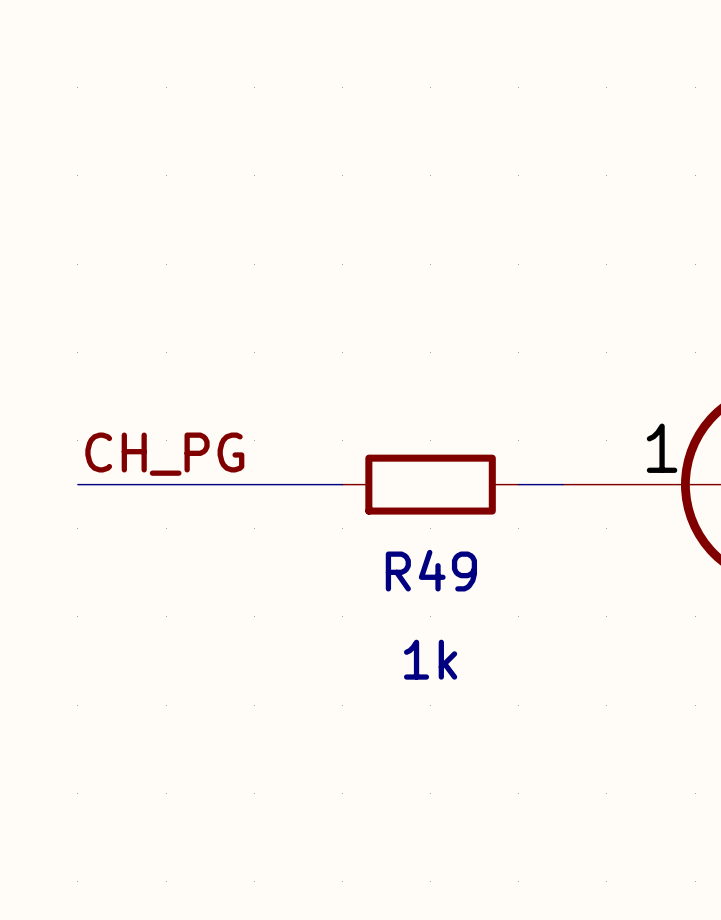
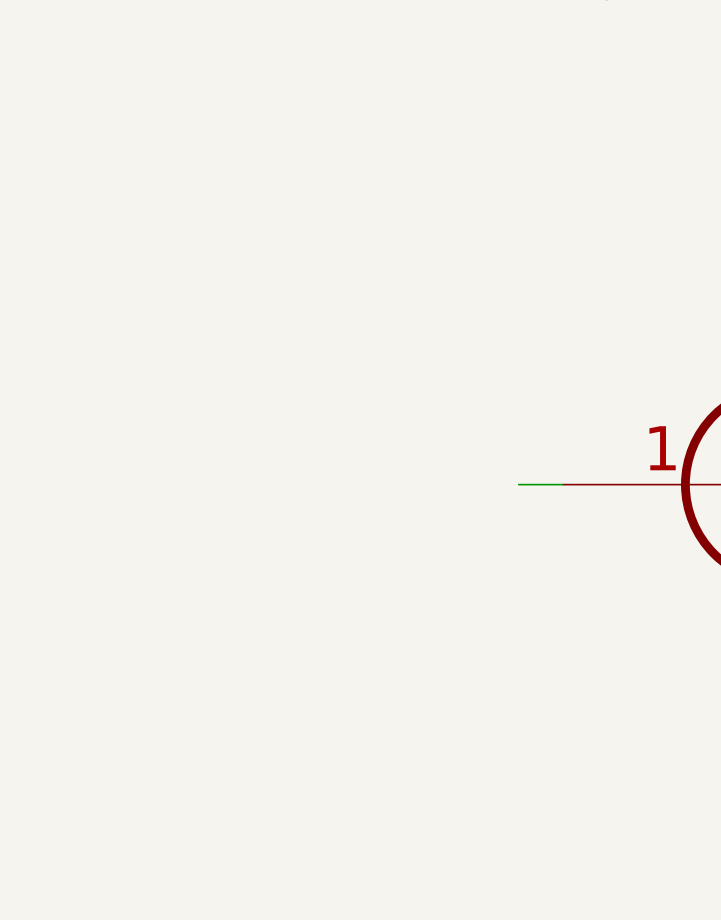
label: CH_PG (164, 454) -> none
wire: (77, 484) (342, 484) -> none
R49: 1k (430, 484) -> none

